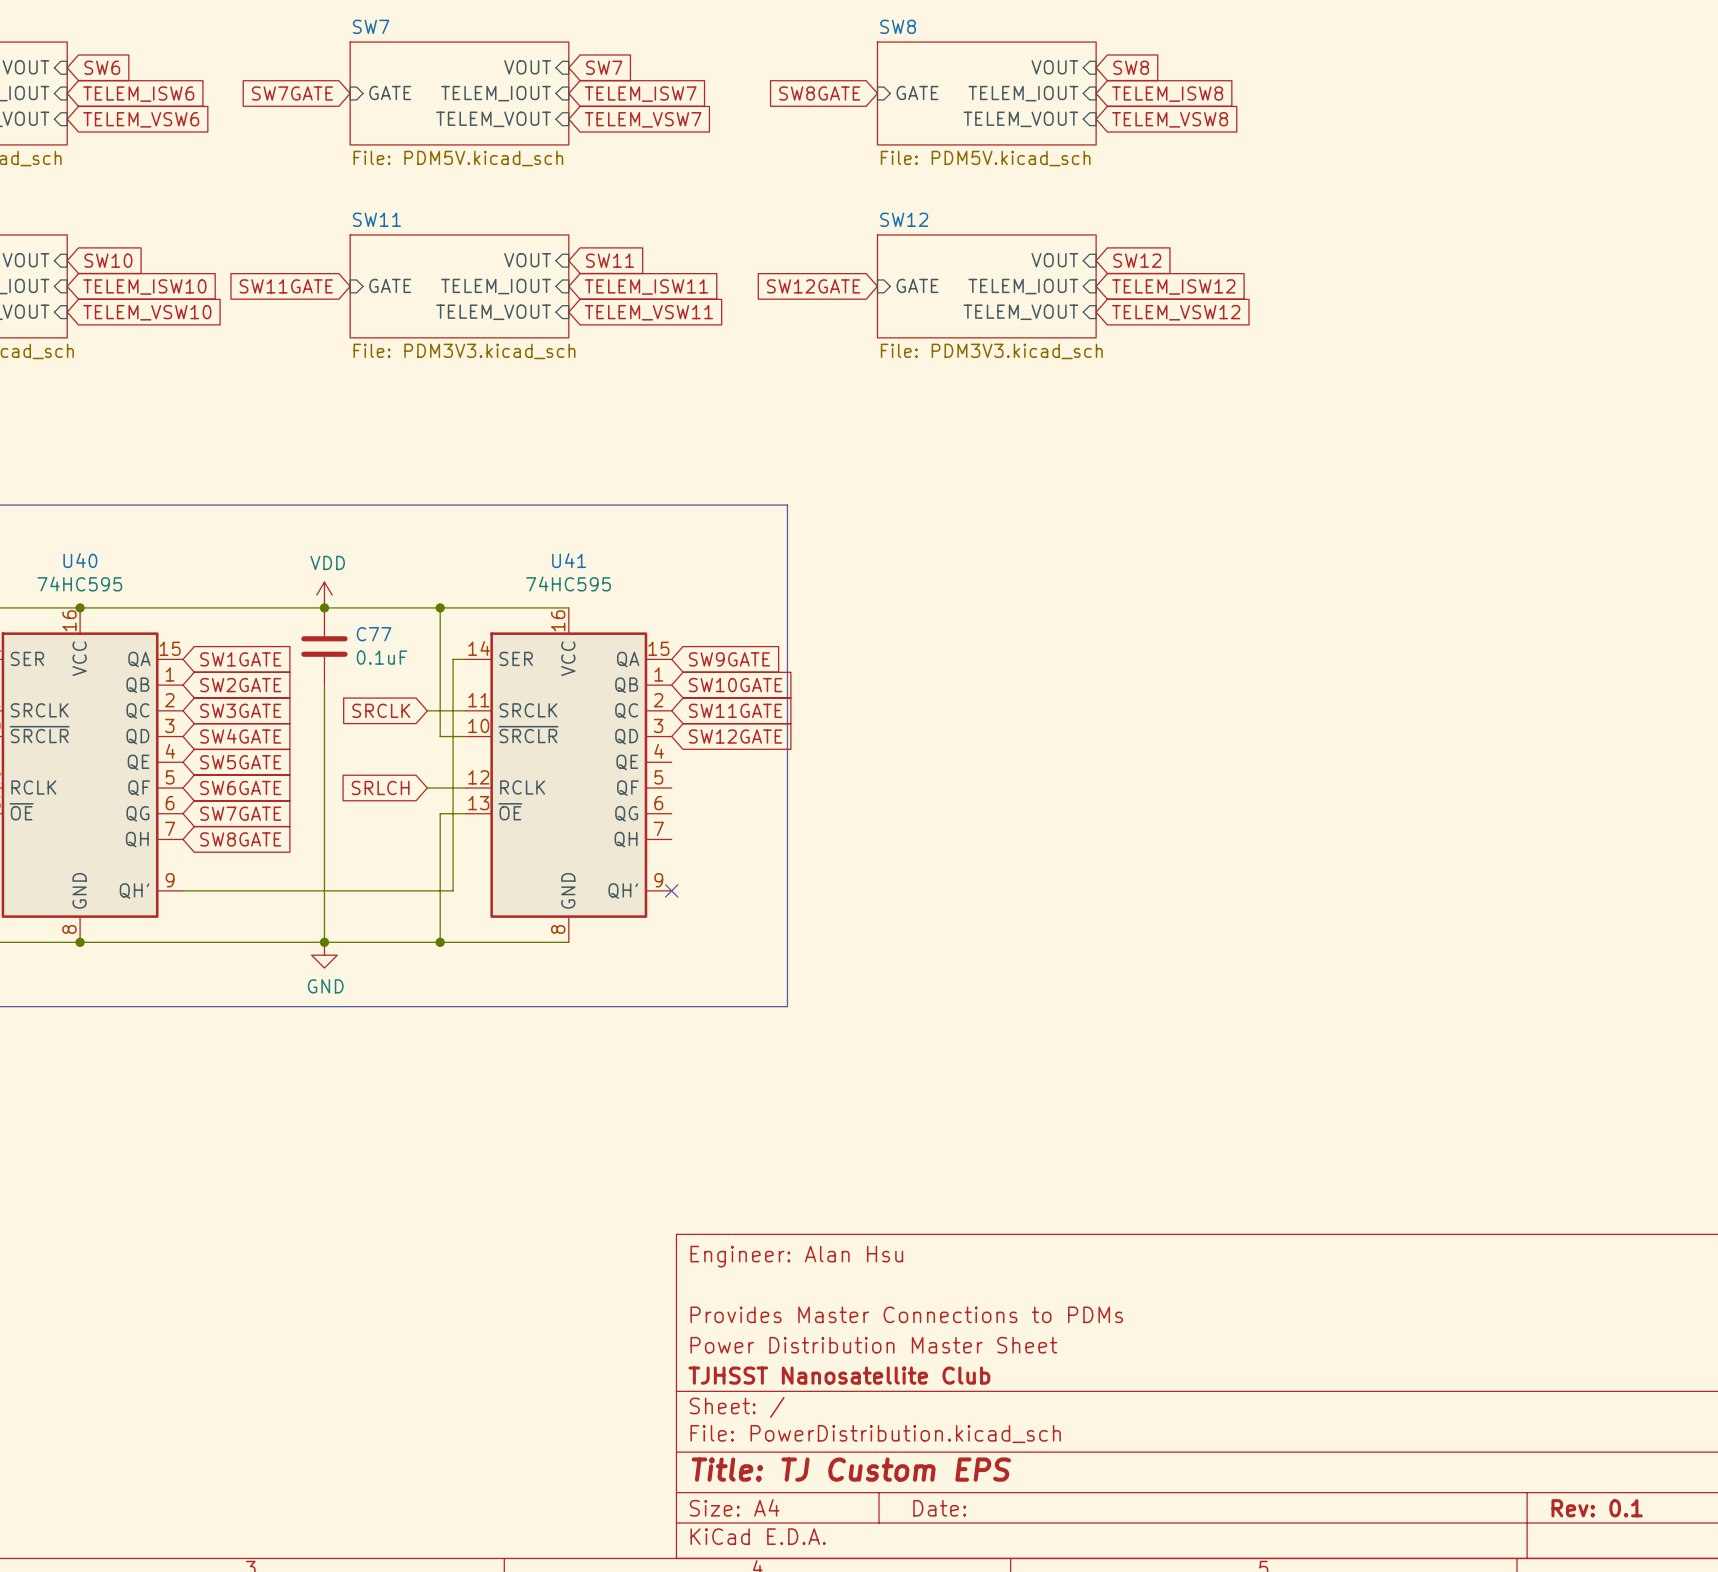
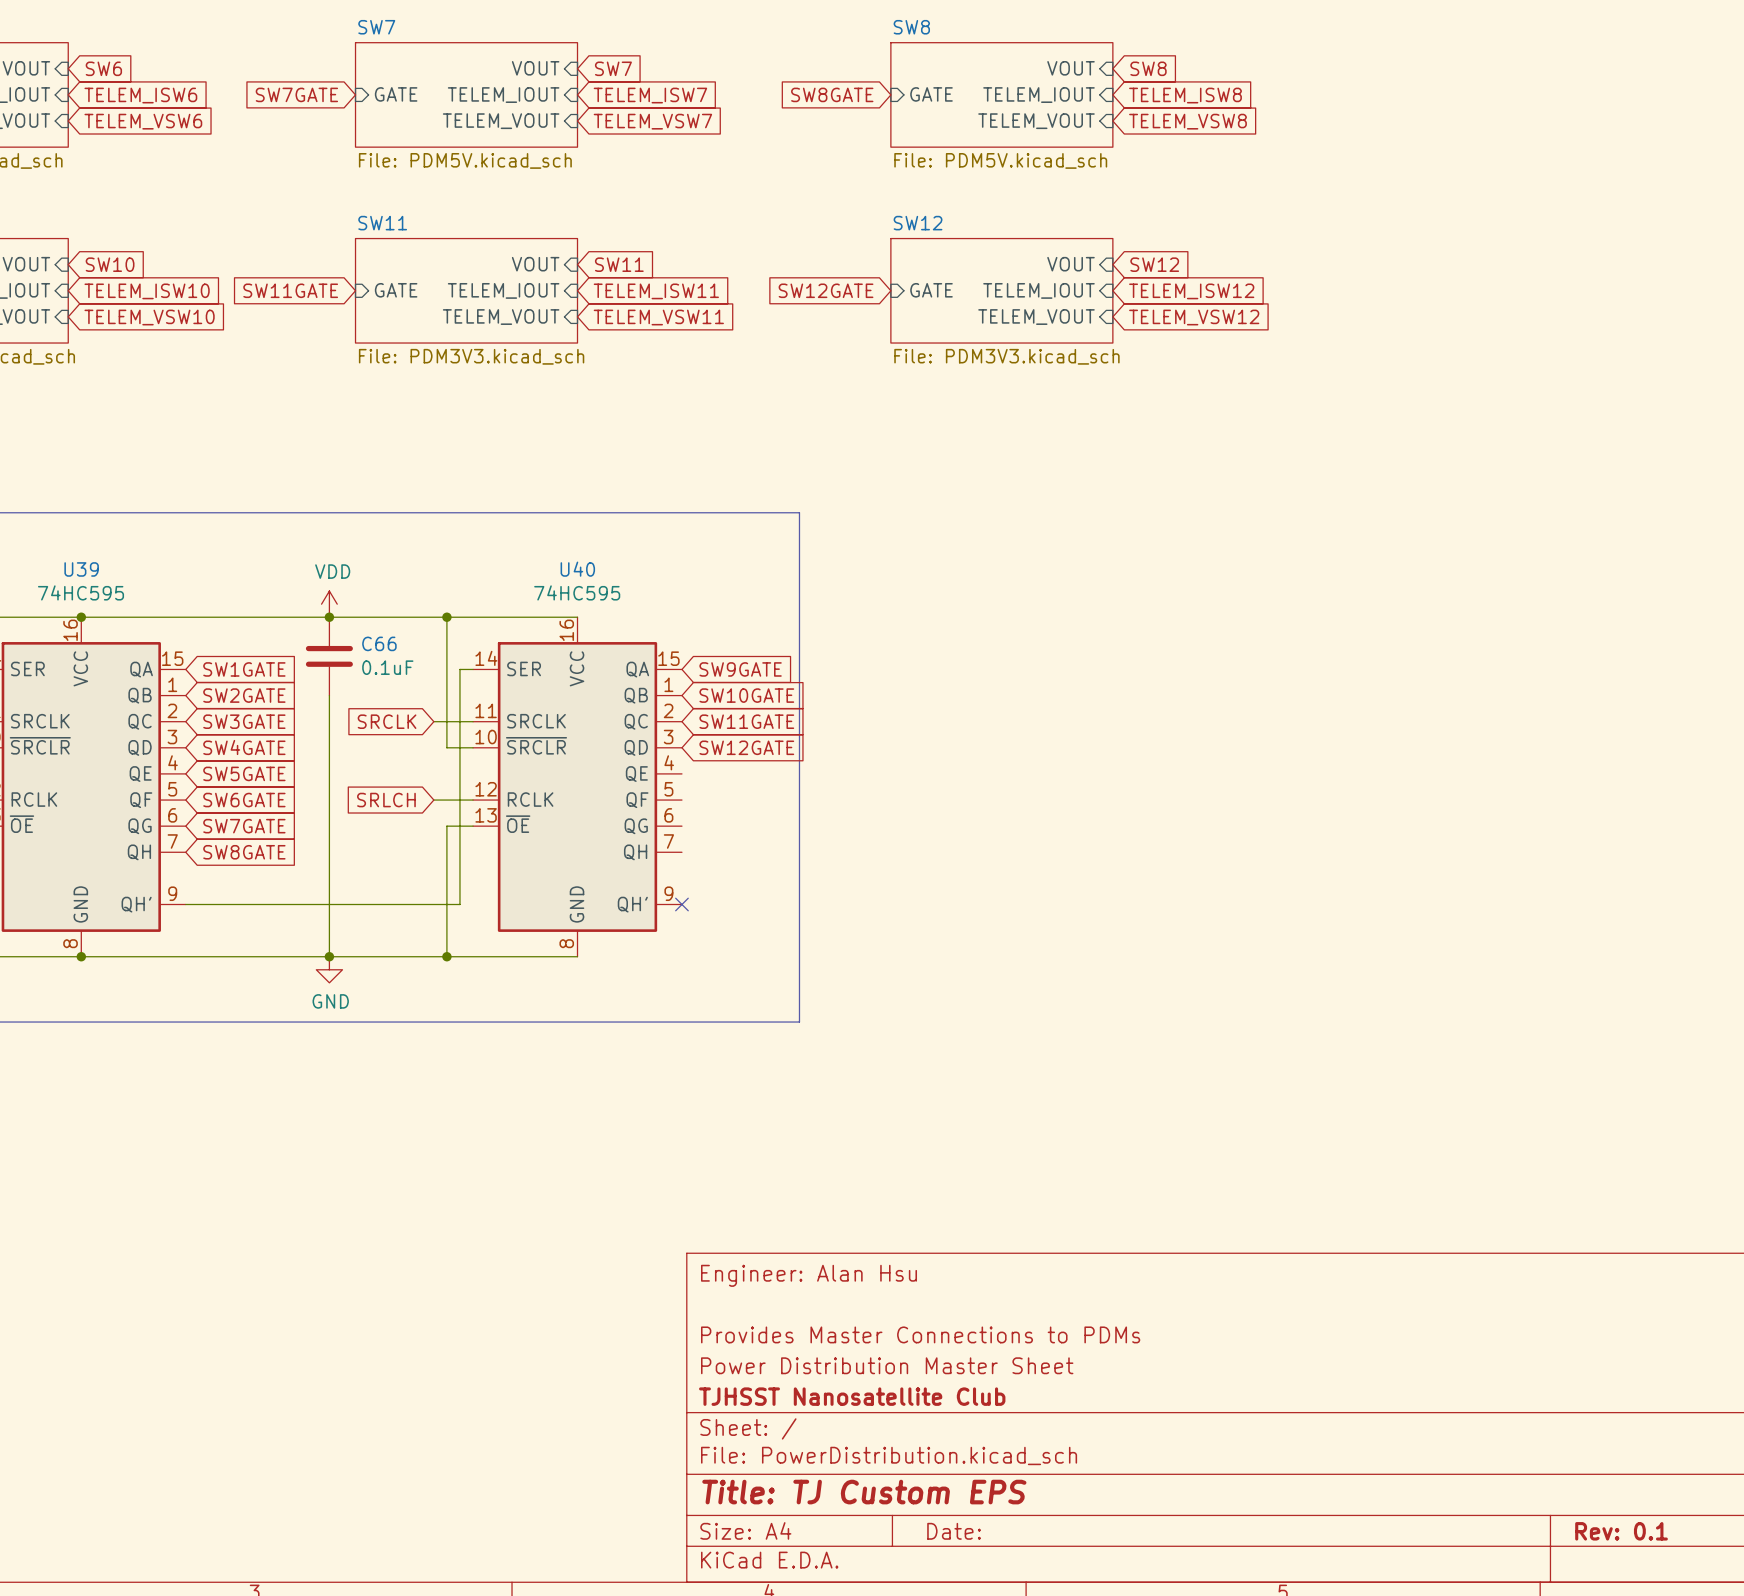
U40 name: U40 (80, 560) -> U39 (81, 569)
U41 name: U41 (569, 560) -> U40 (577, 569)
C77 name: C77 (374, 634) -> C66 (379, 643)

